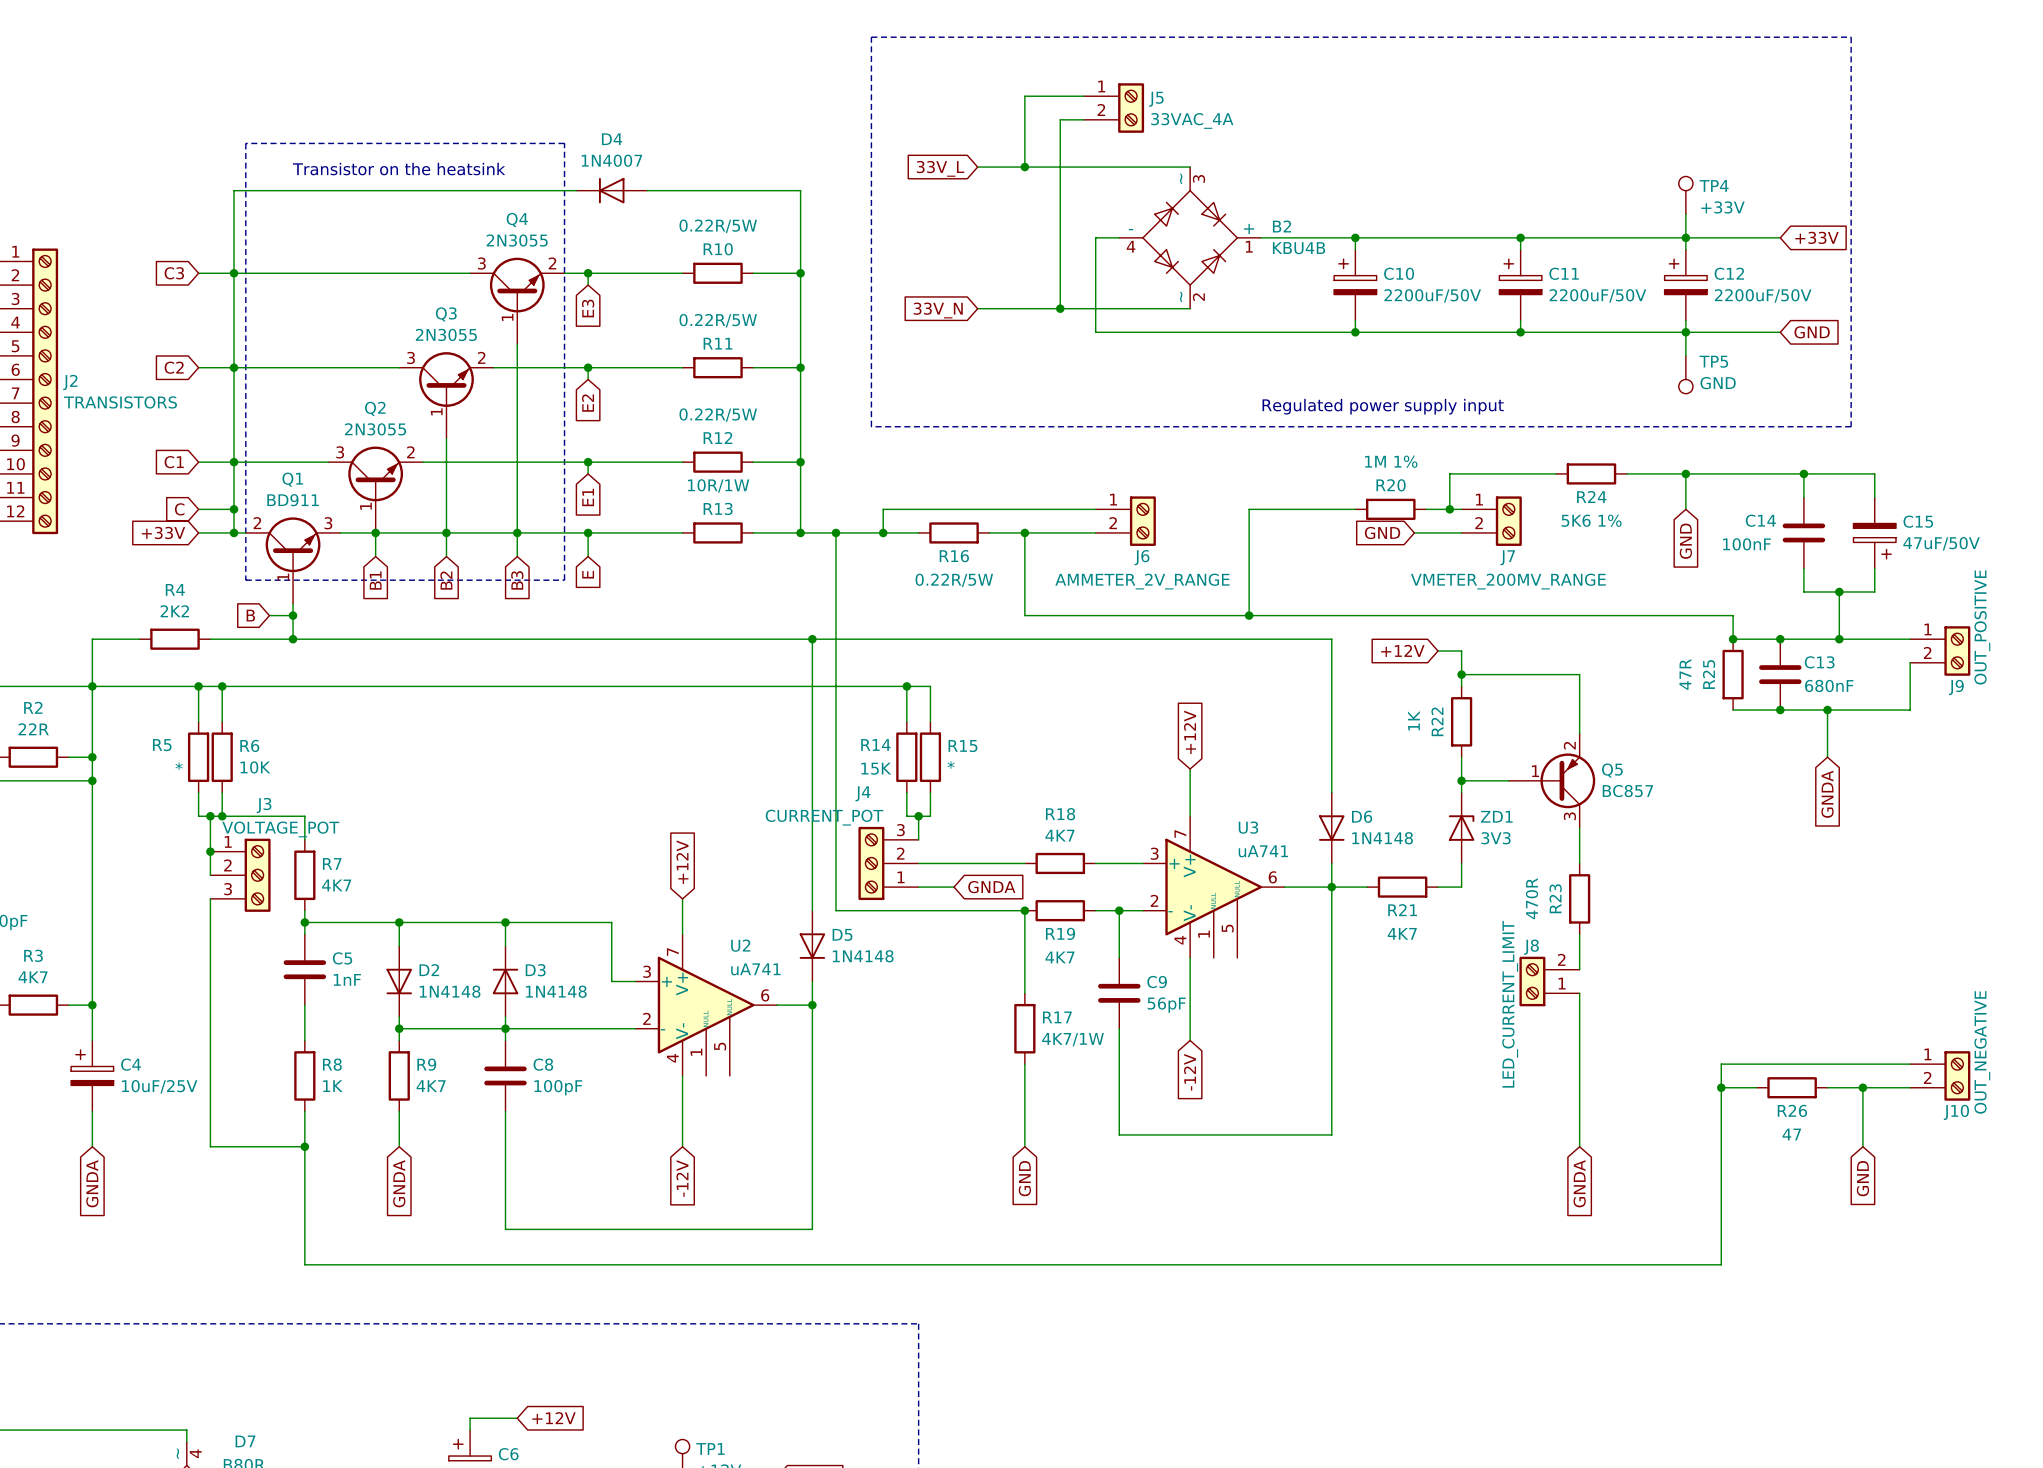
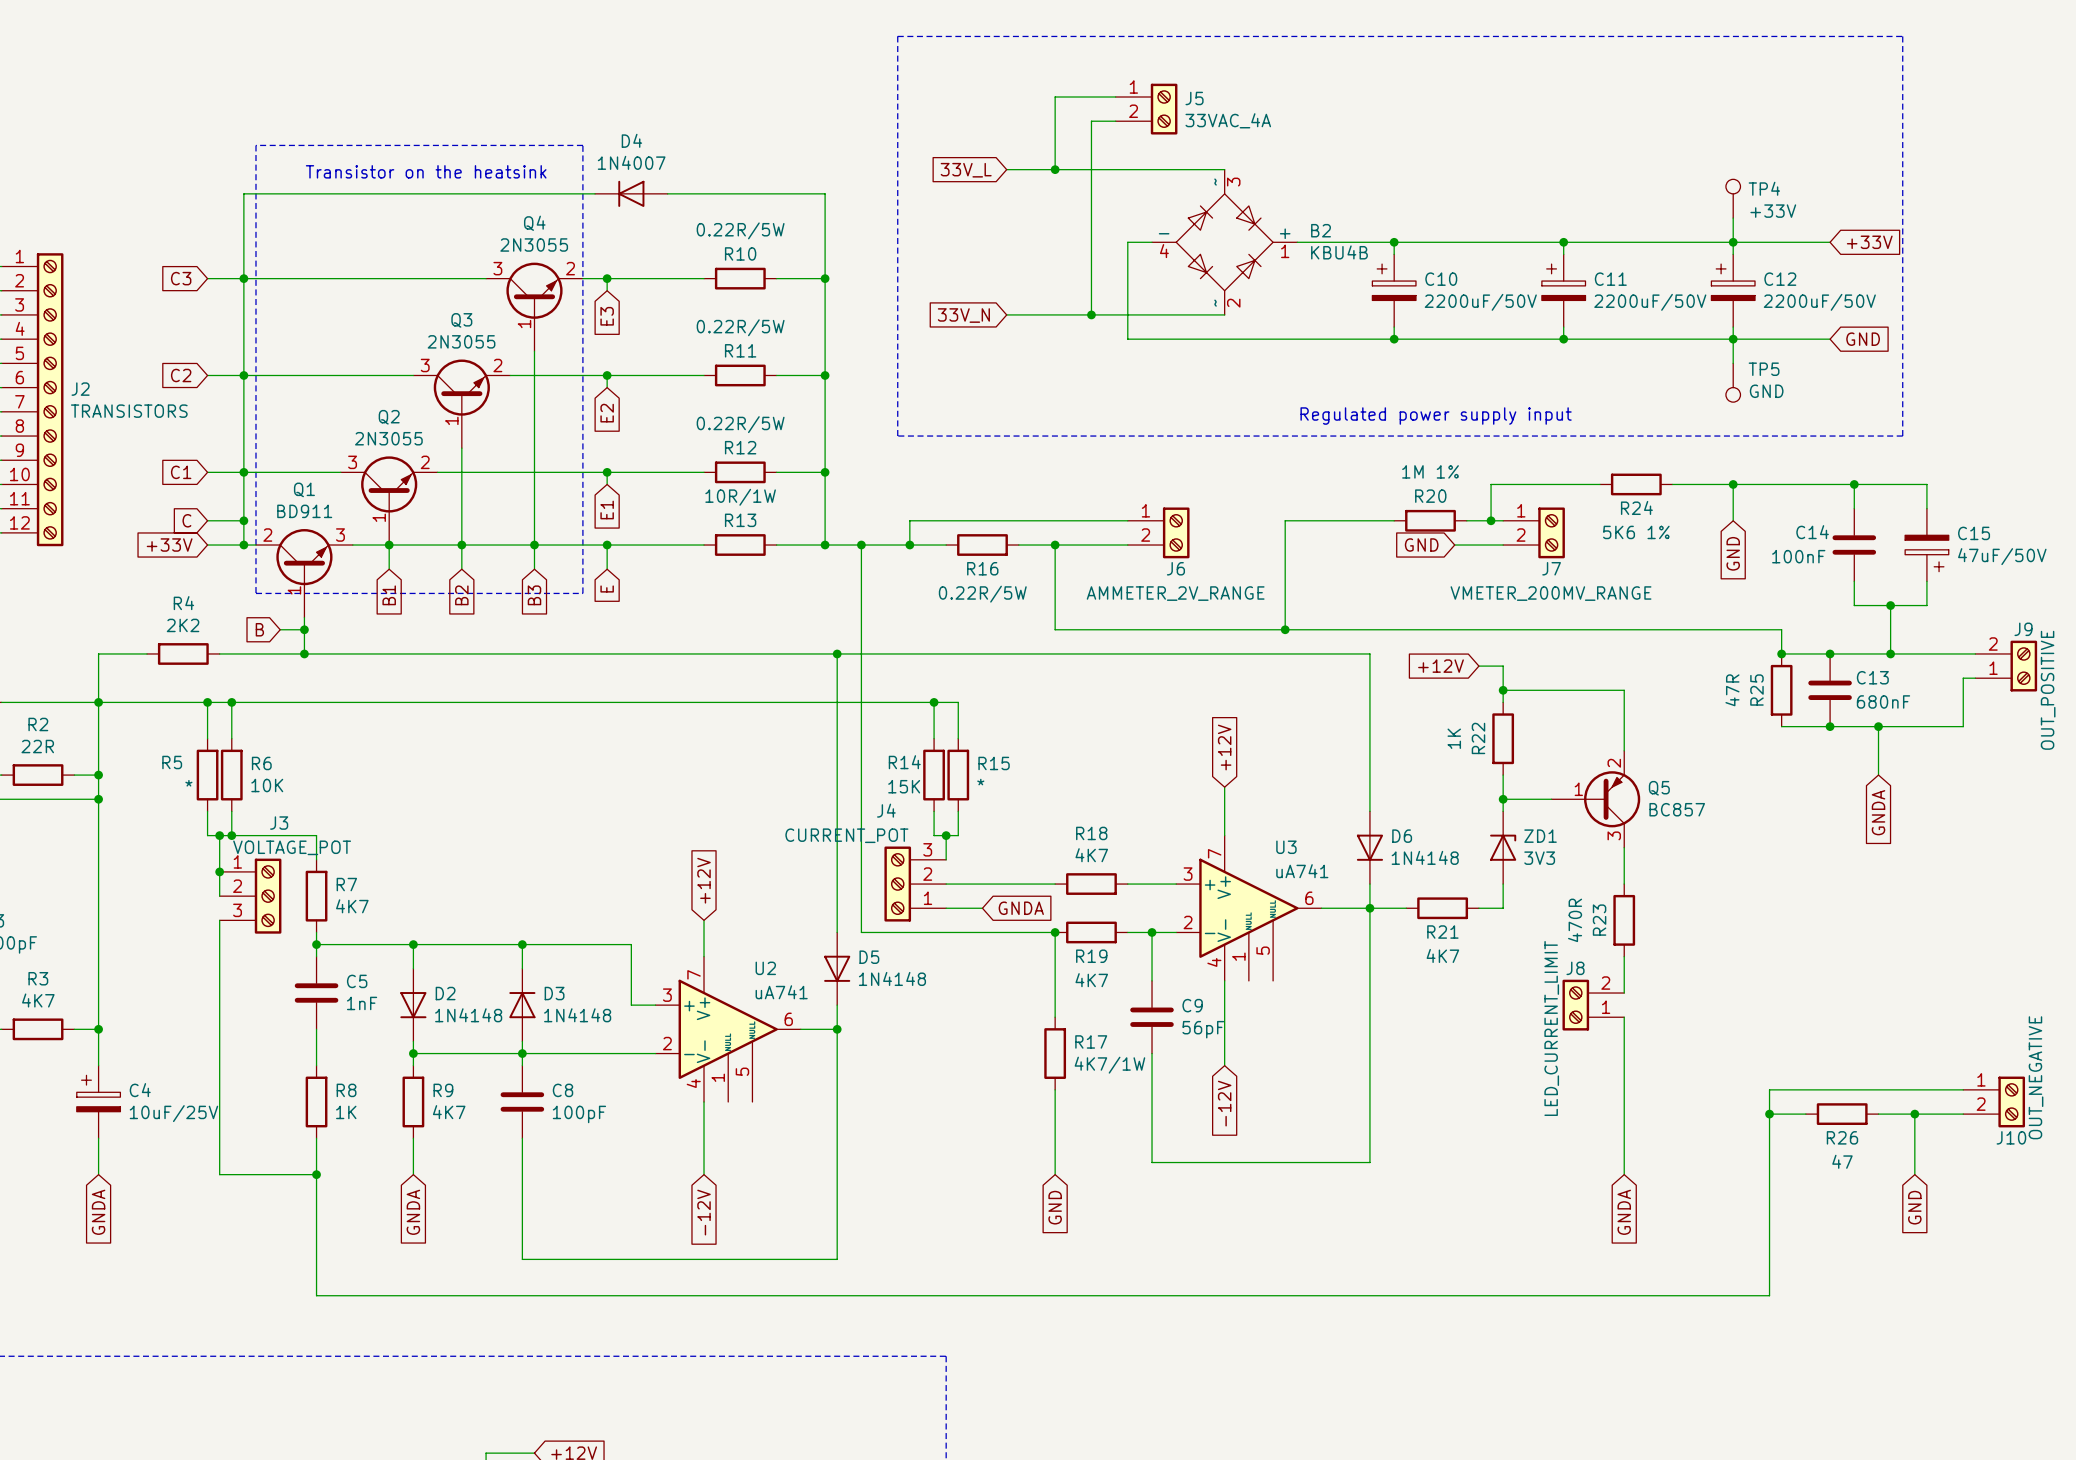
J9 flip: as is (1957, 651) -> up-down (2023, 666)

